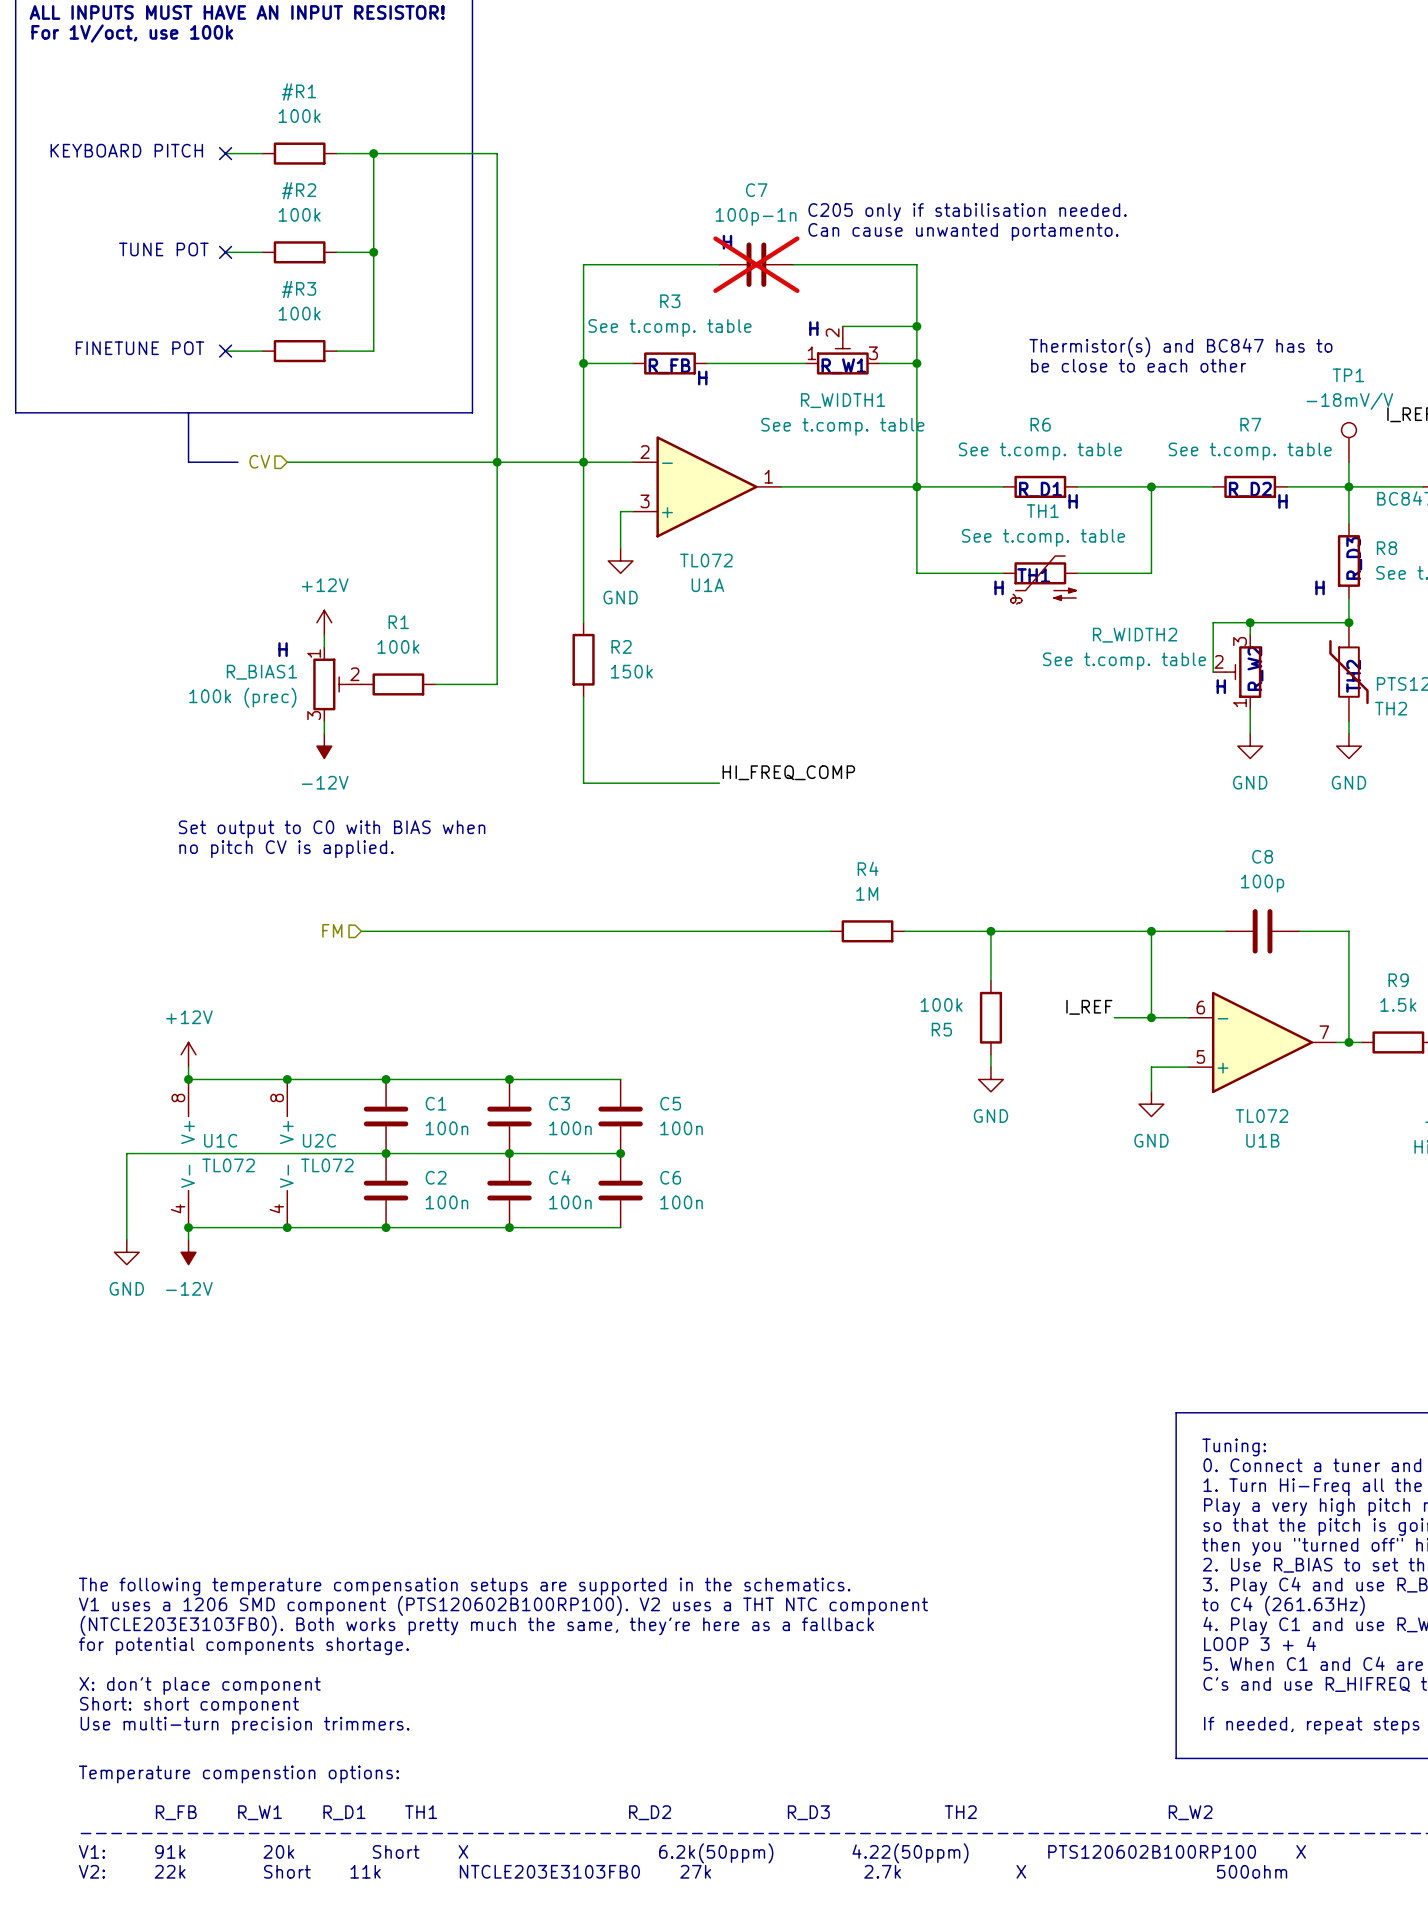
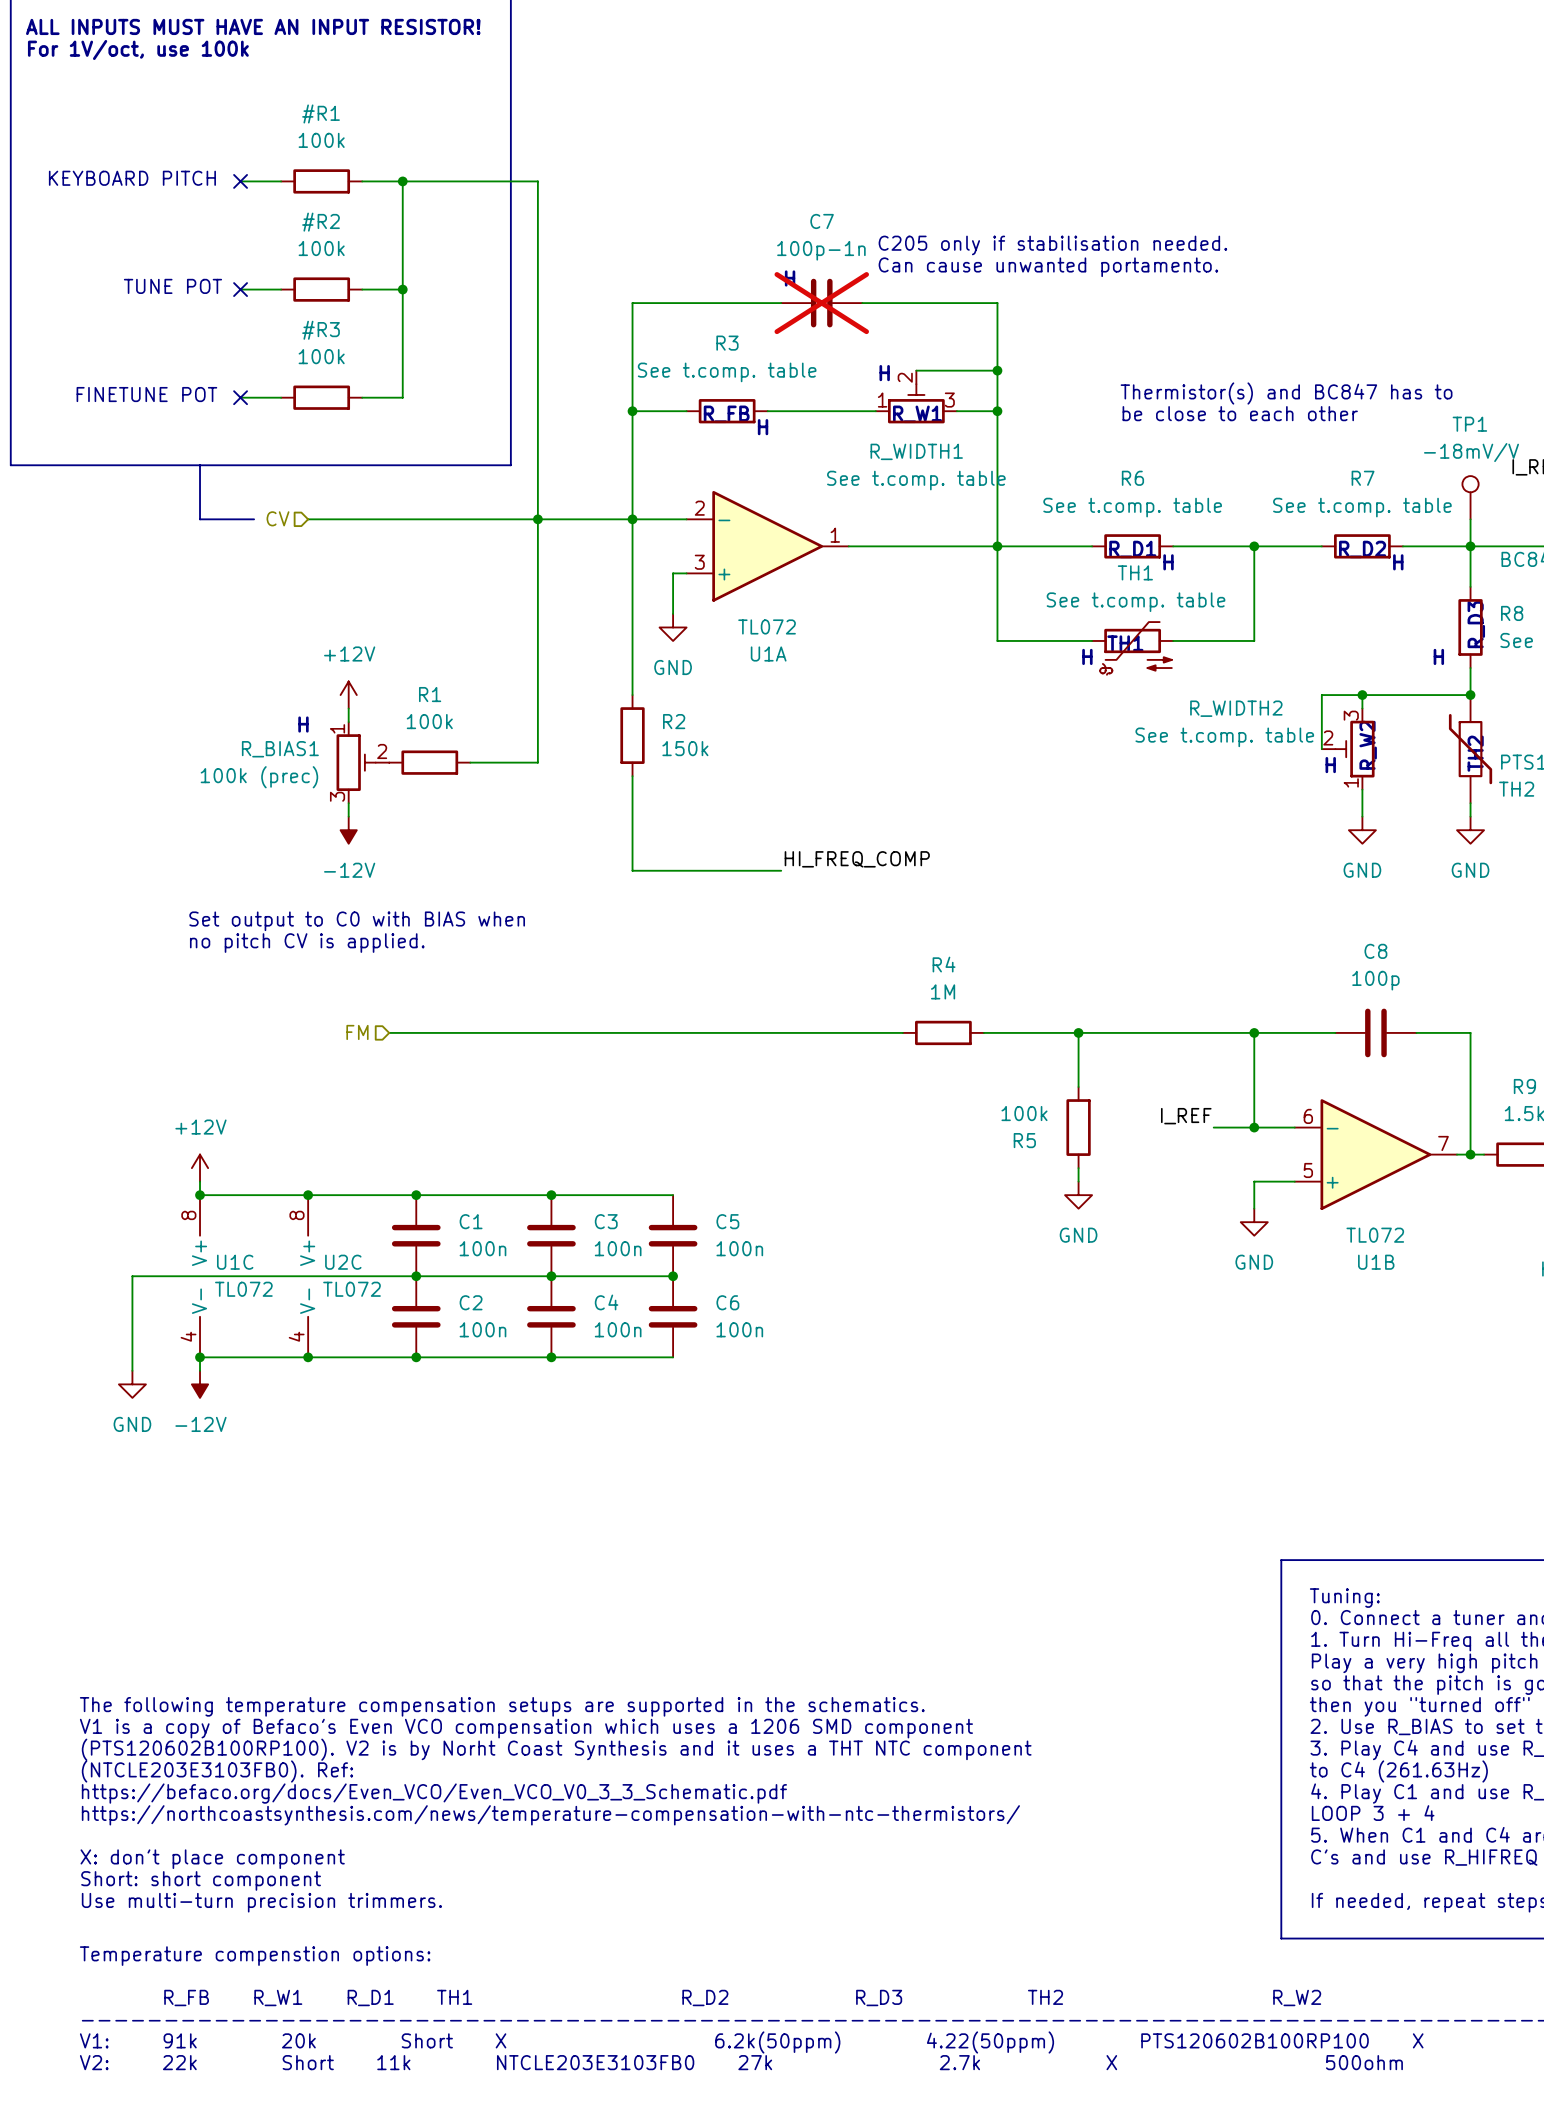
text: none -> The following temperature compensation setups are supported in the schematics. (502, 1706)
text: none -> V1 is a copy of Befaco's Even VCO compensation which uses a 1206 SMD component (526, 1728)
text: The following temperature compensation setups are supported in the schematics. (464, 1586) -> (PTS120602B100RP100). V2 is by Norht Coast Synthesis and it uses a THT NTC component (556, 1749)
text: V1 uses a 1206 SMD component (PTS120602B100RP100). V2 uses a THT NTC component (503, 1605) -> (NTCLE203E3103FB0). Ref: (217, 1771)
text: (NTCLE203E3103FB0). Both works pretty much the same, they're here as a fallback (477, 1625) -> https://befaco.org/docs/Even_VCO/Even_VCO_V0_3_3_Schematic.pdf (434, 1793)
text: for potential components shortage. (243, 1646) -> https://northcoastsynthesis.com/news/temperature-compensation-with-ntc-thermistors/ (550, 1815)

